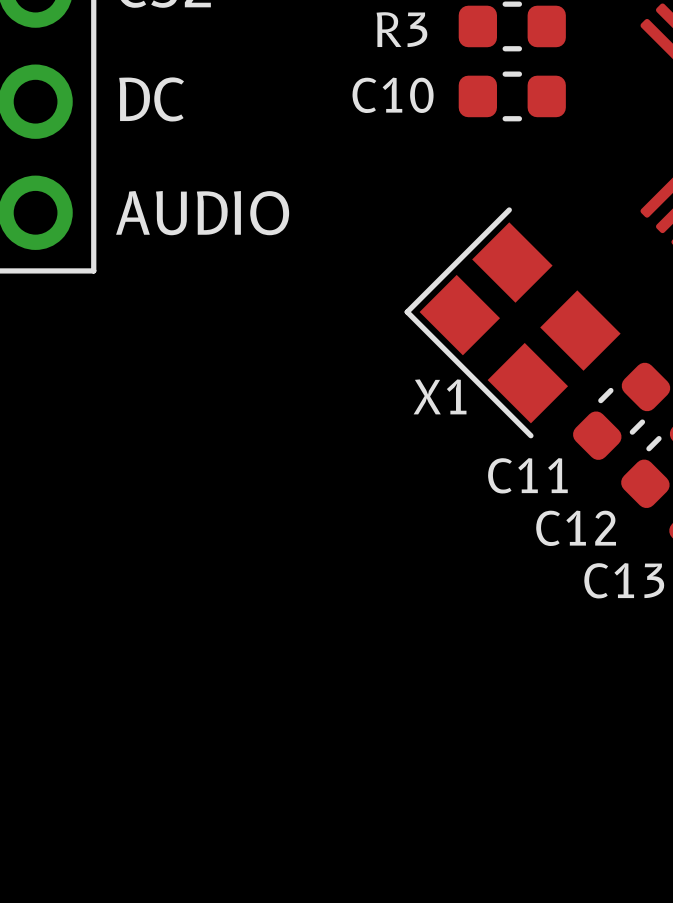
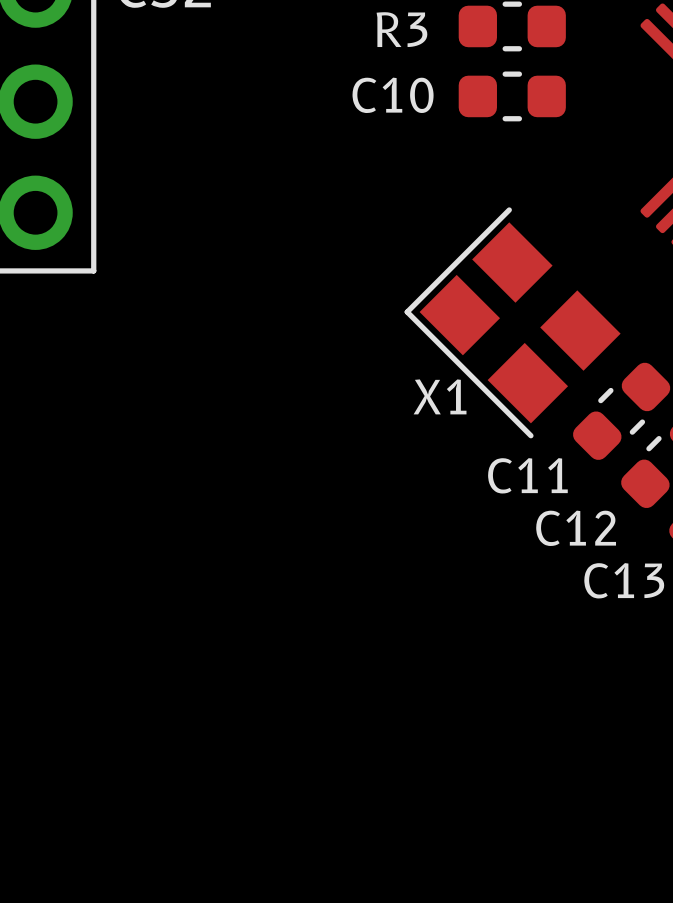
text: DC (151, 99) -> none
text: AUDIO (202, 213) -> none

